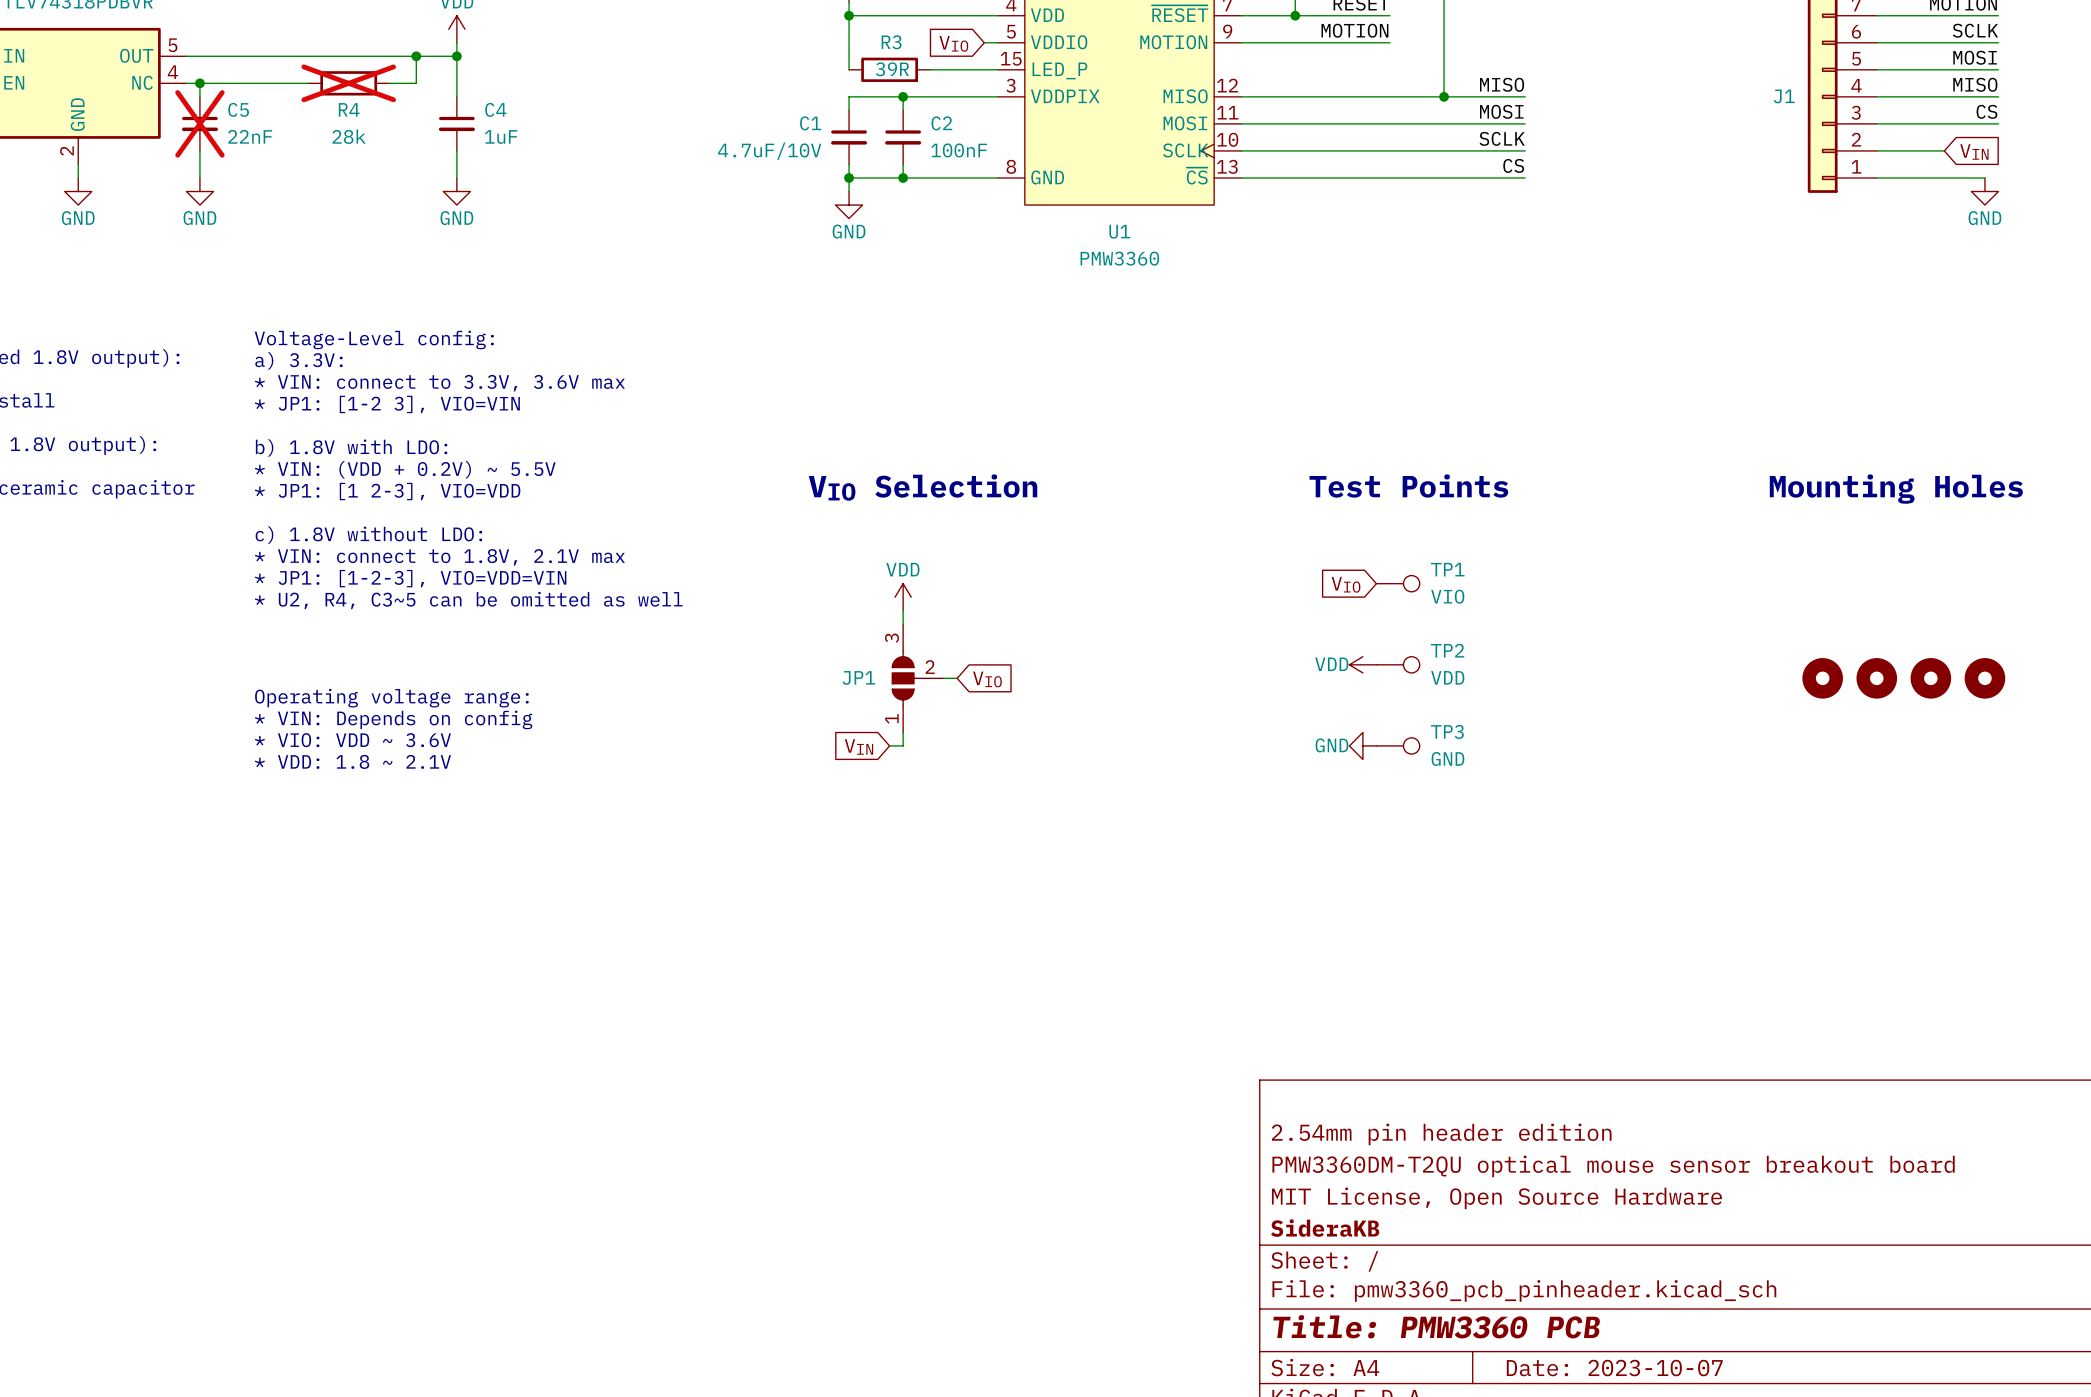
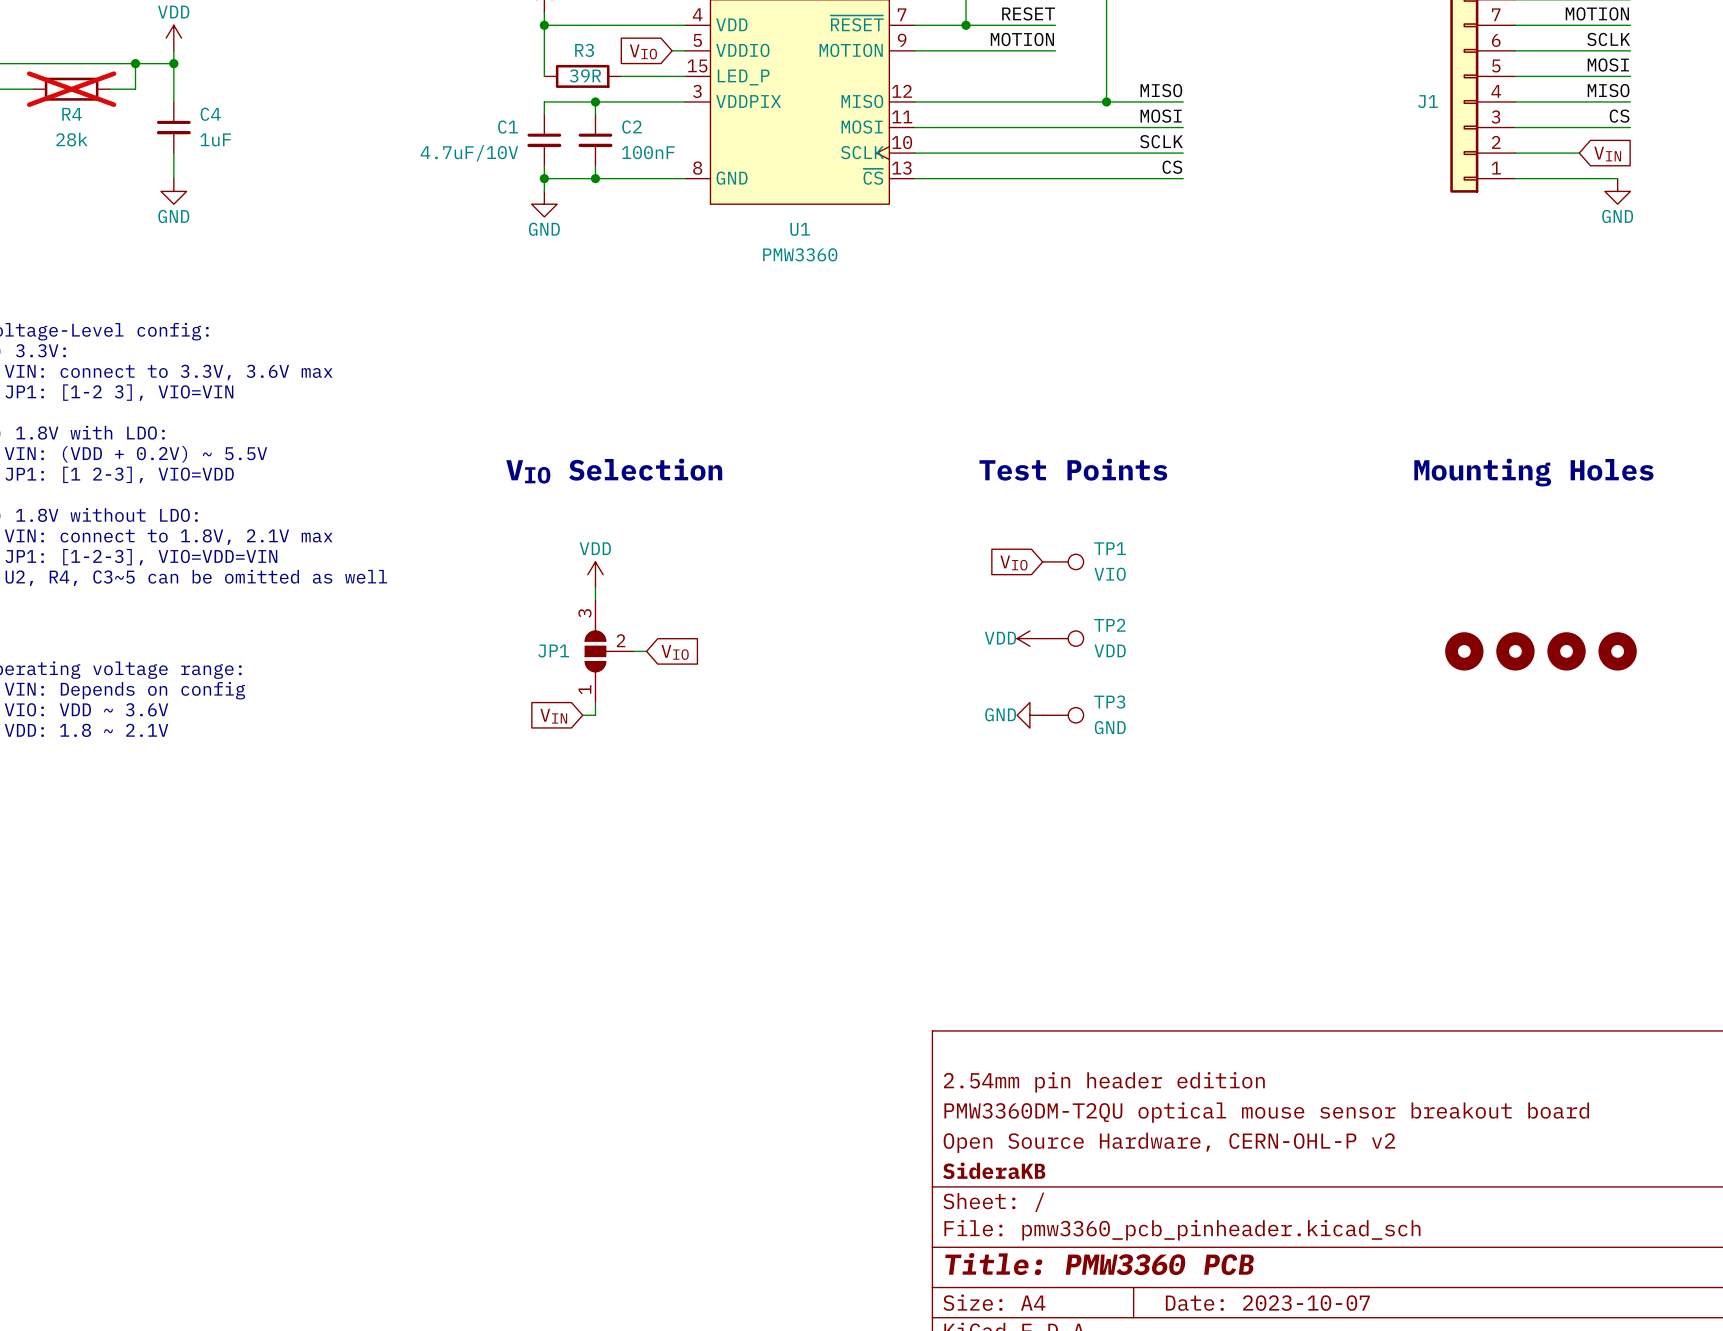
title block: MIT License, Open Source Hardware (1496, 1198) -> Open Source Hardware, CERN-OHL-P v2 (1169, 1142)

